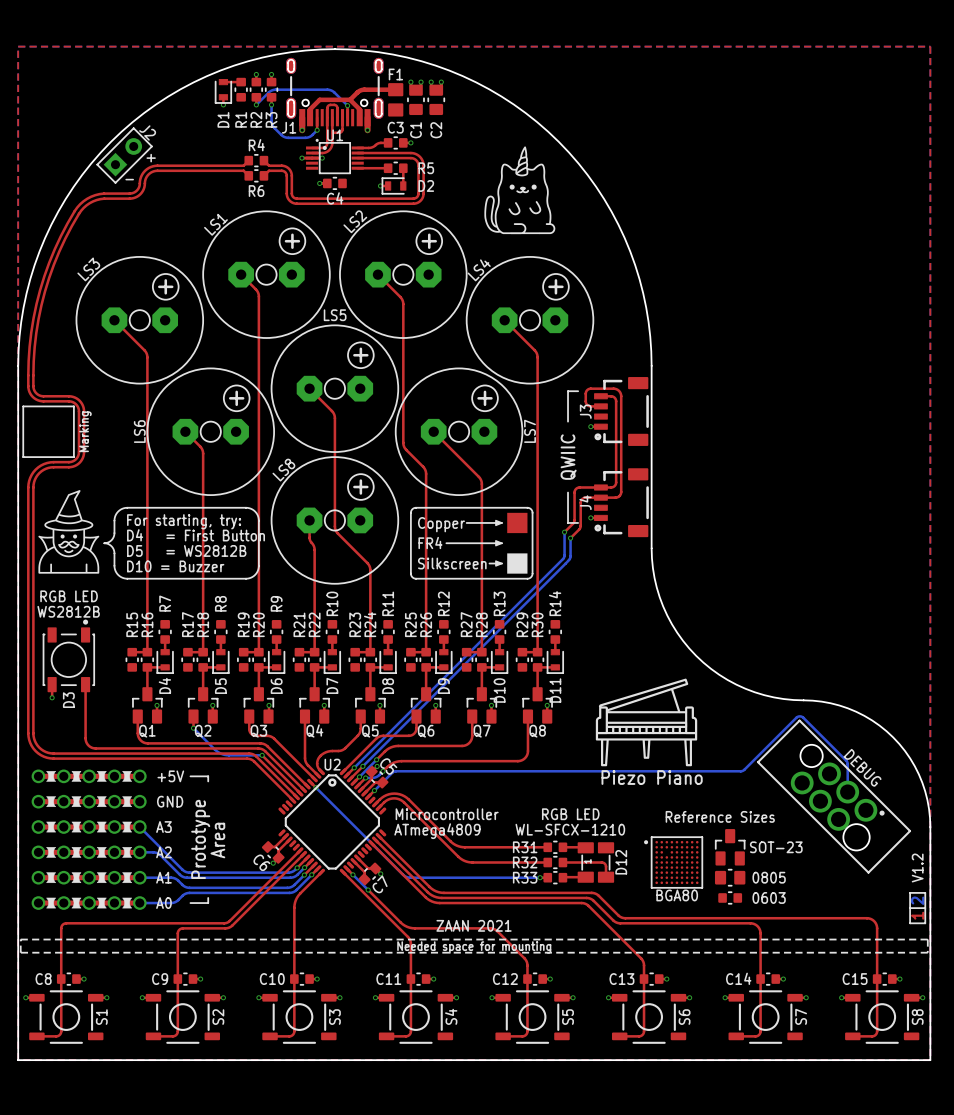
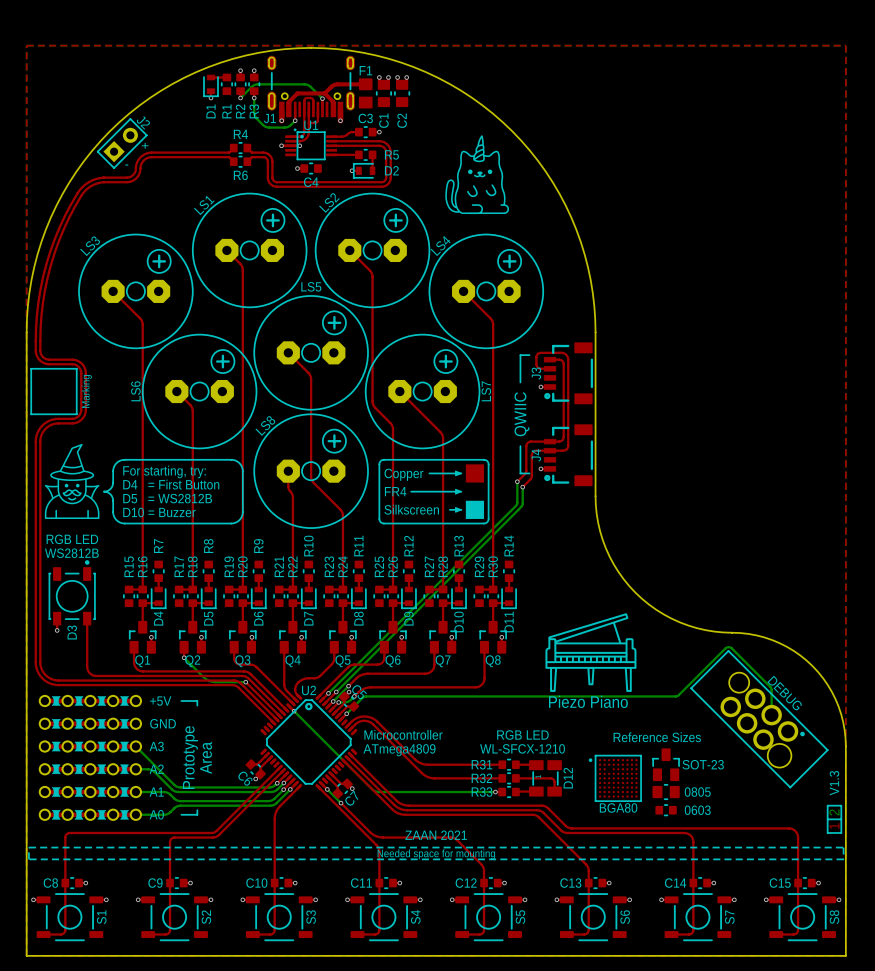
text: V1.2 (917, 868) -> V1.3 (834, 783)

